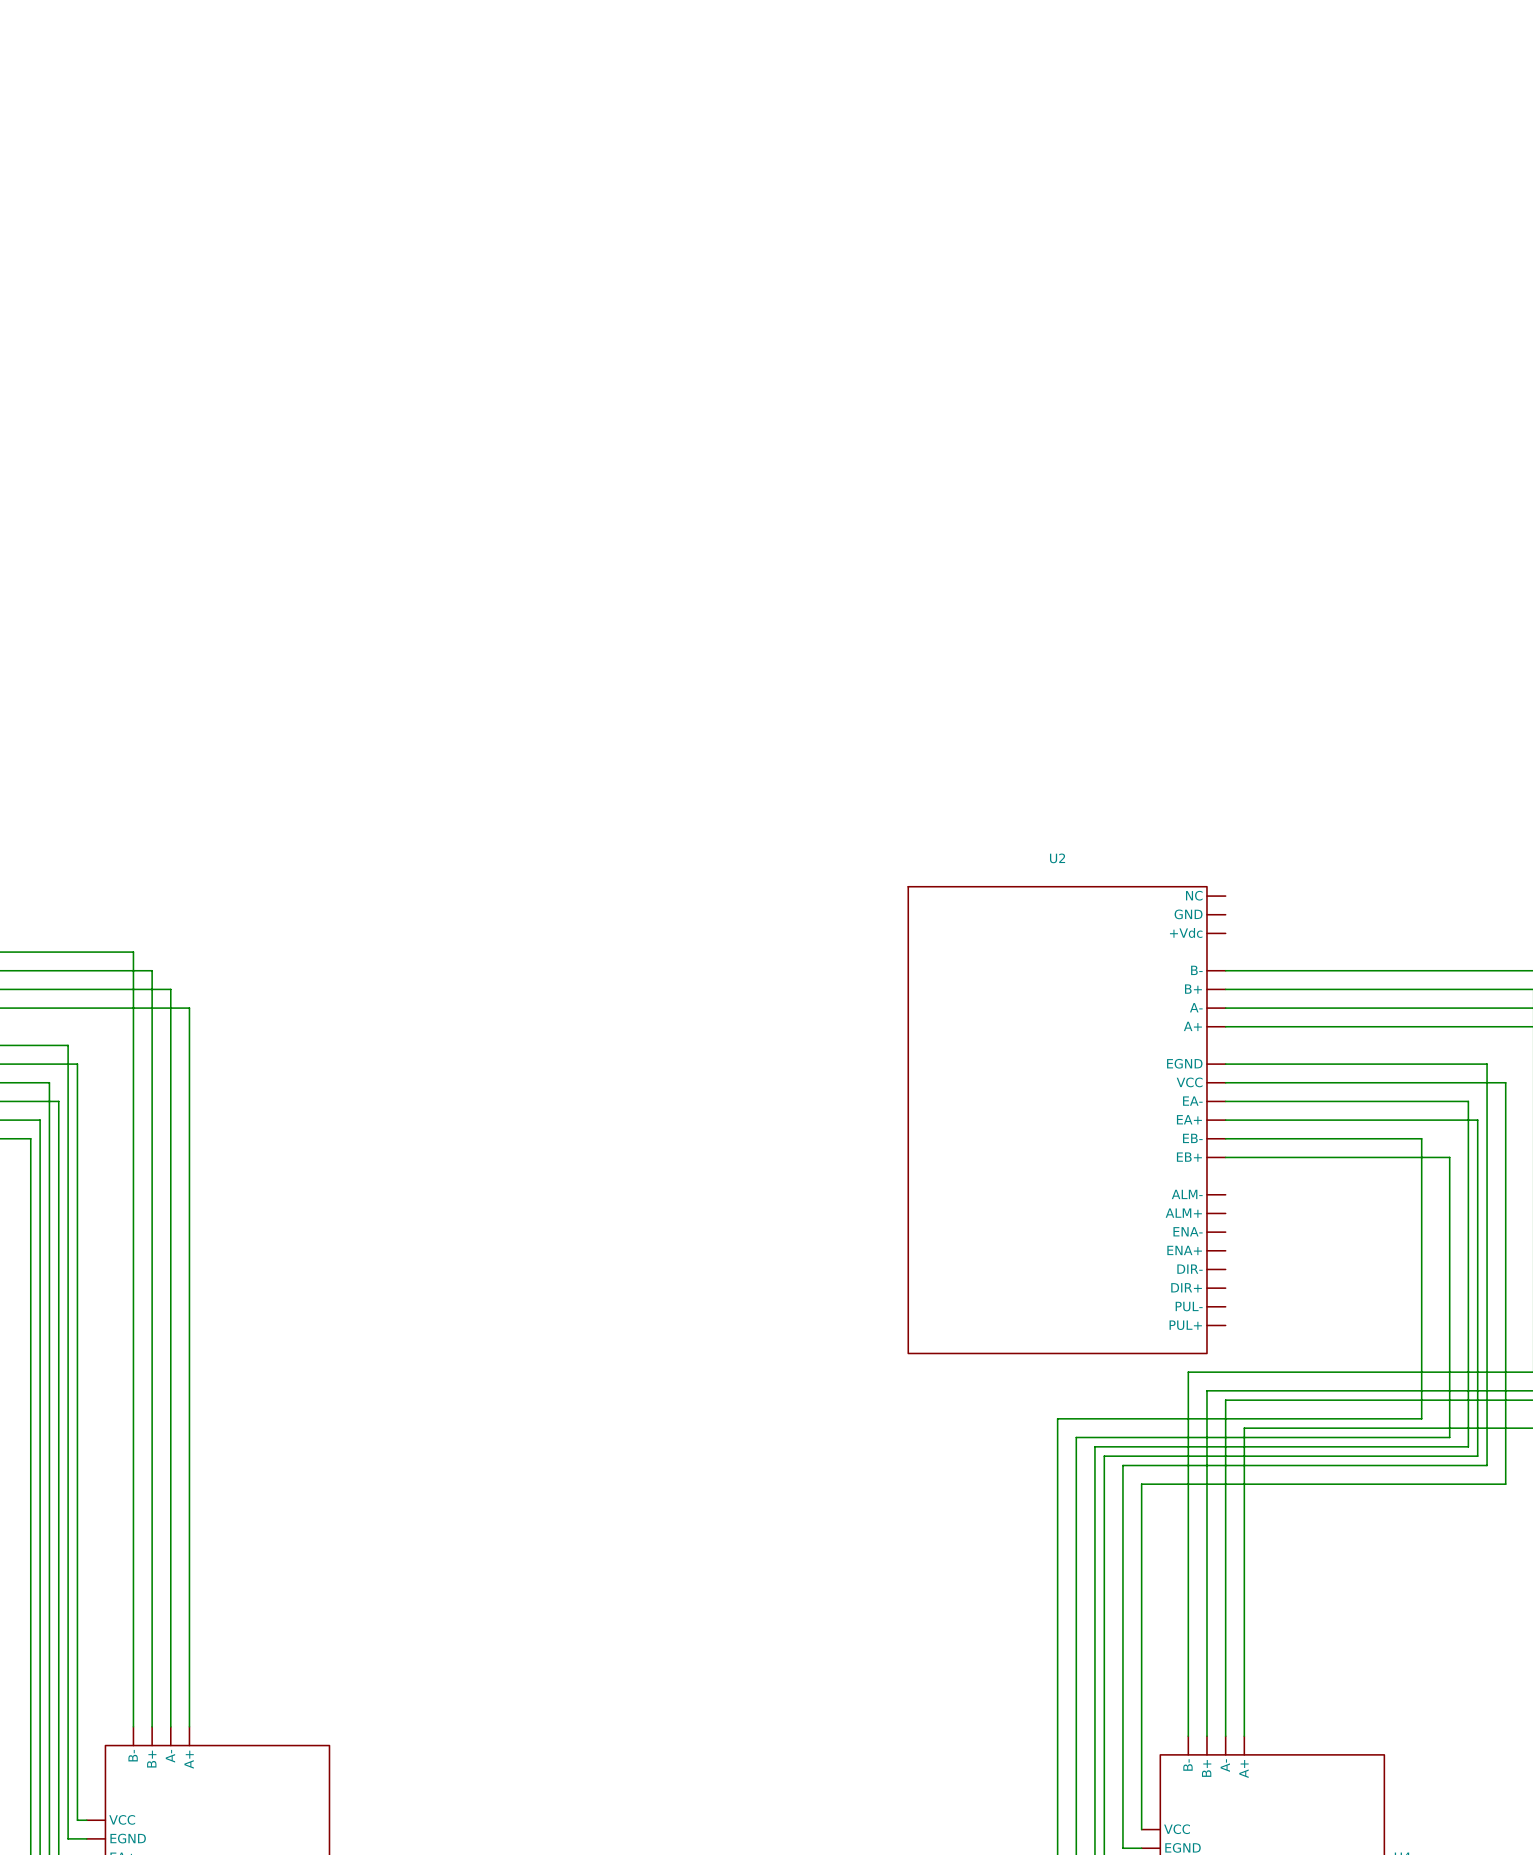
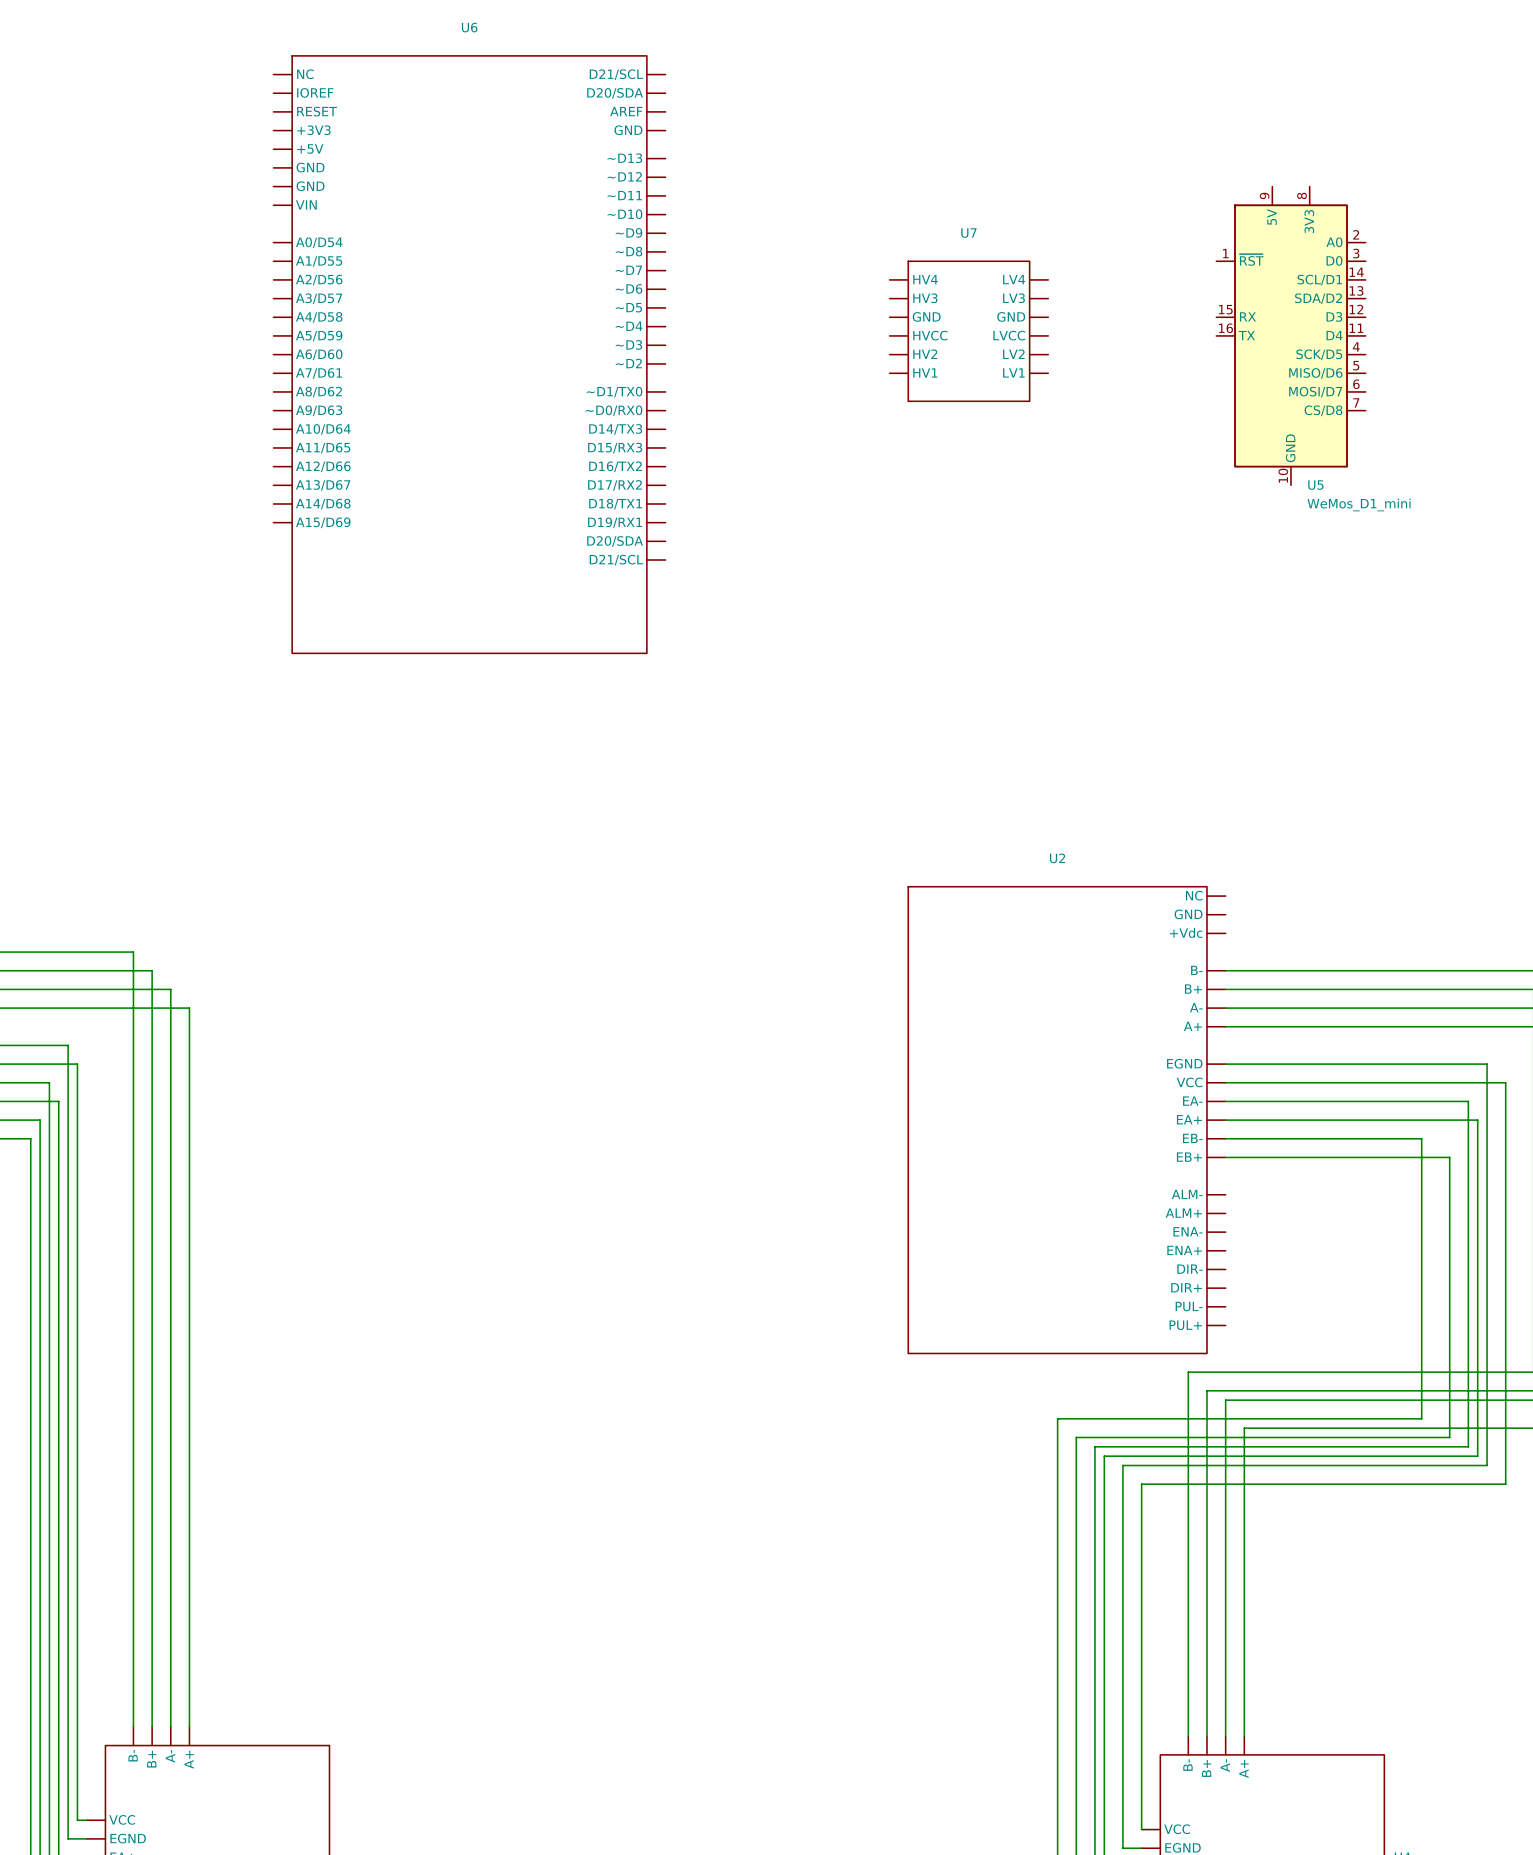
U7: none -> (968, 331)
U5: none -> WeMos_D1_mini (1291, 335)
U6: none -> (469, 354)

